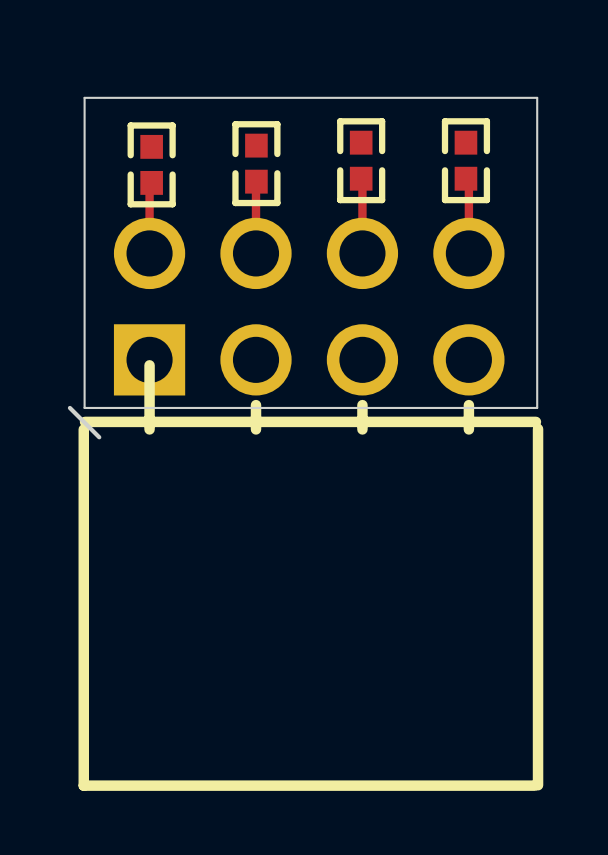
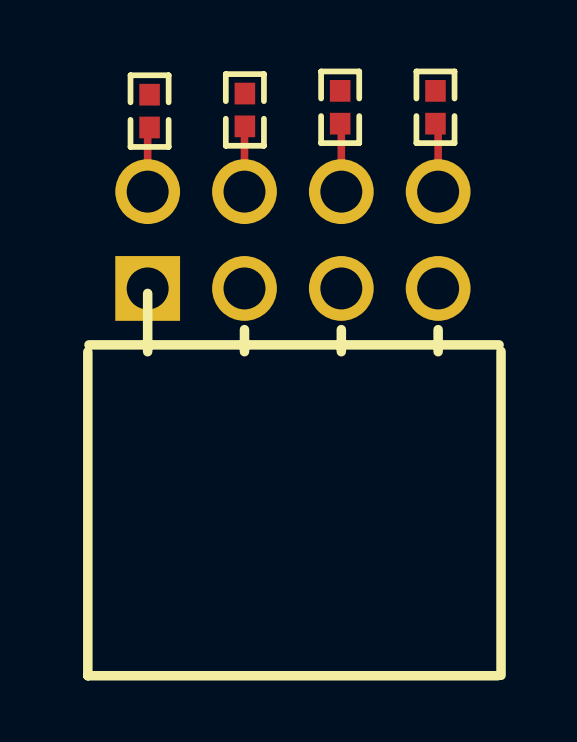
board edge: (84, 97) (537, 97) (537, 407) (84, 407) (84, 97) -> none
board edge: (69, 407) (99, 437) -> none

